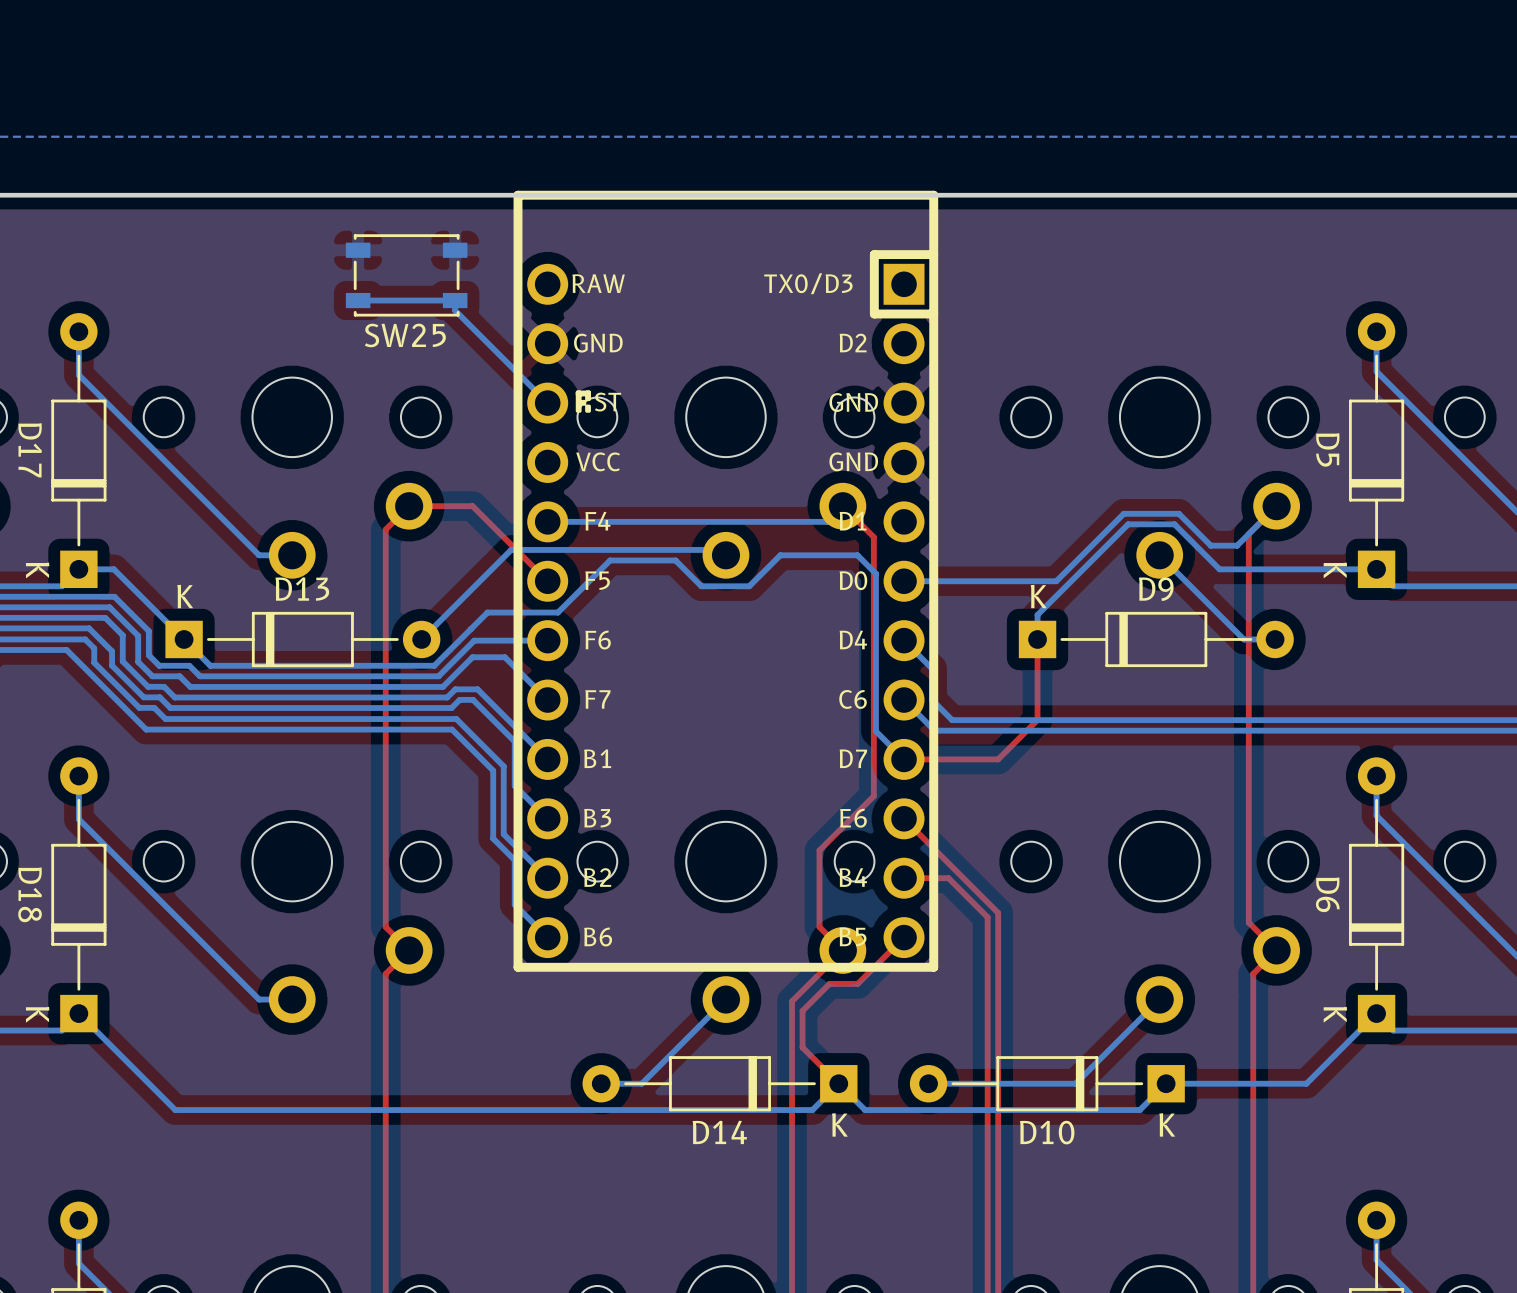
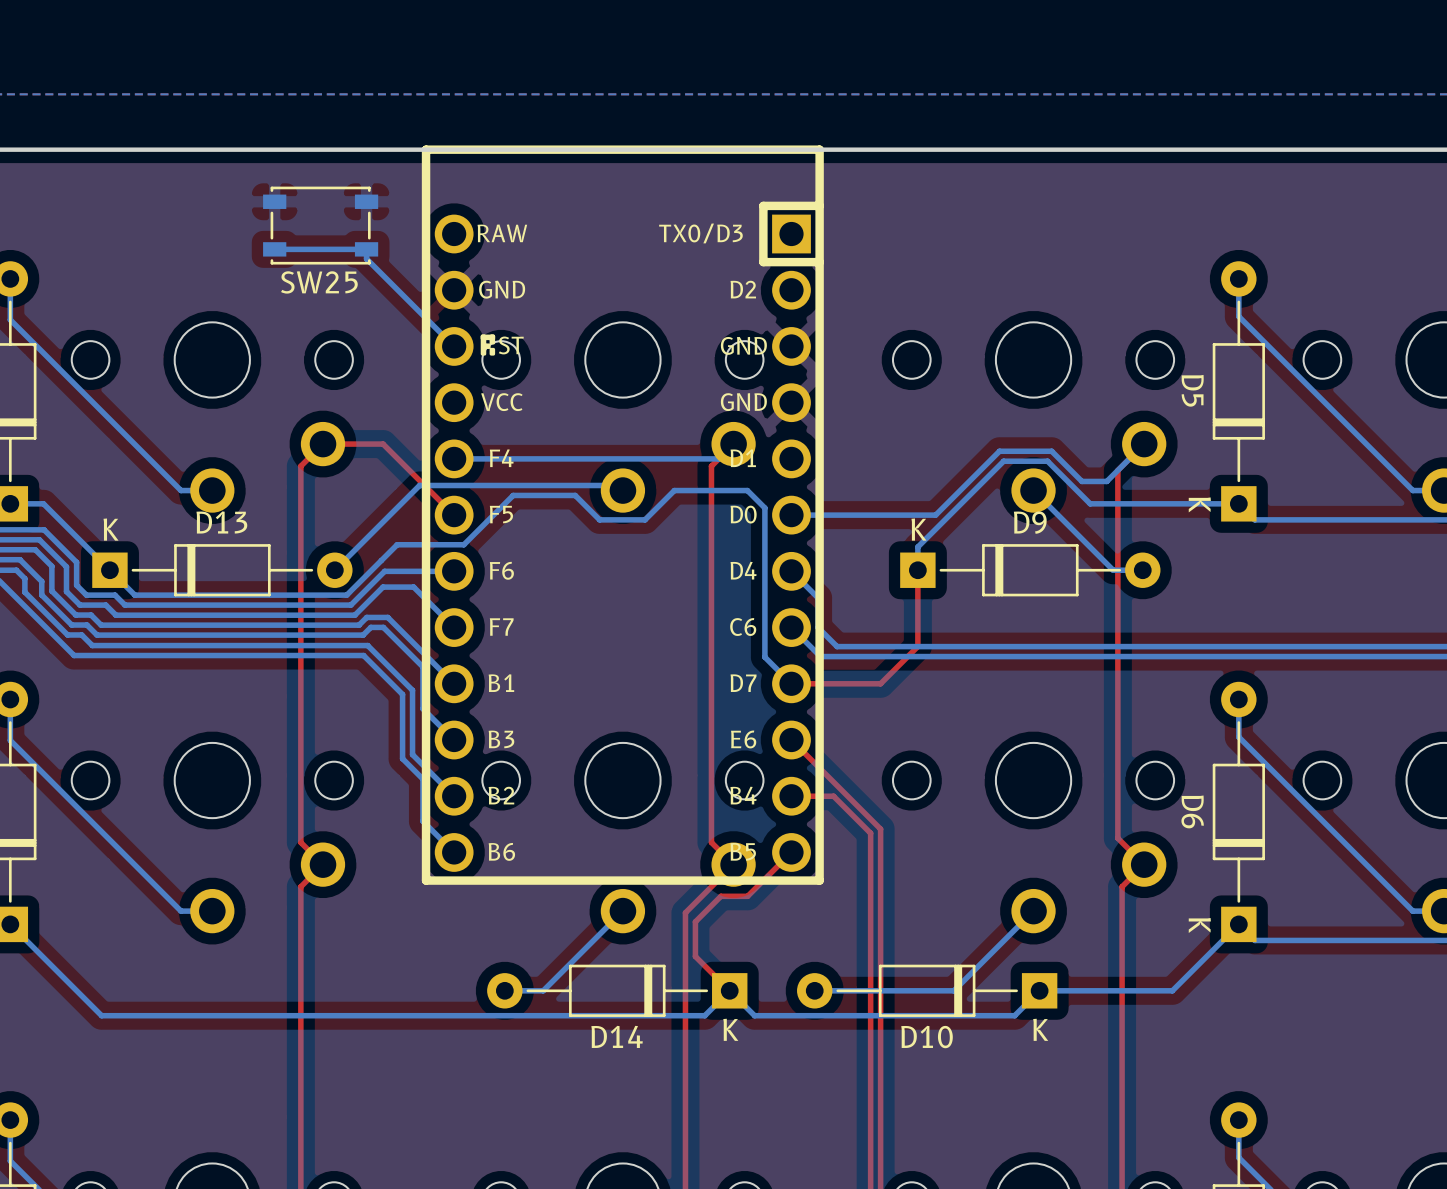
top track: (842, 506) (873, 537) (873, 796) (819, 850) -> (733, 444) (711, 466) (711, 770)

